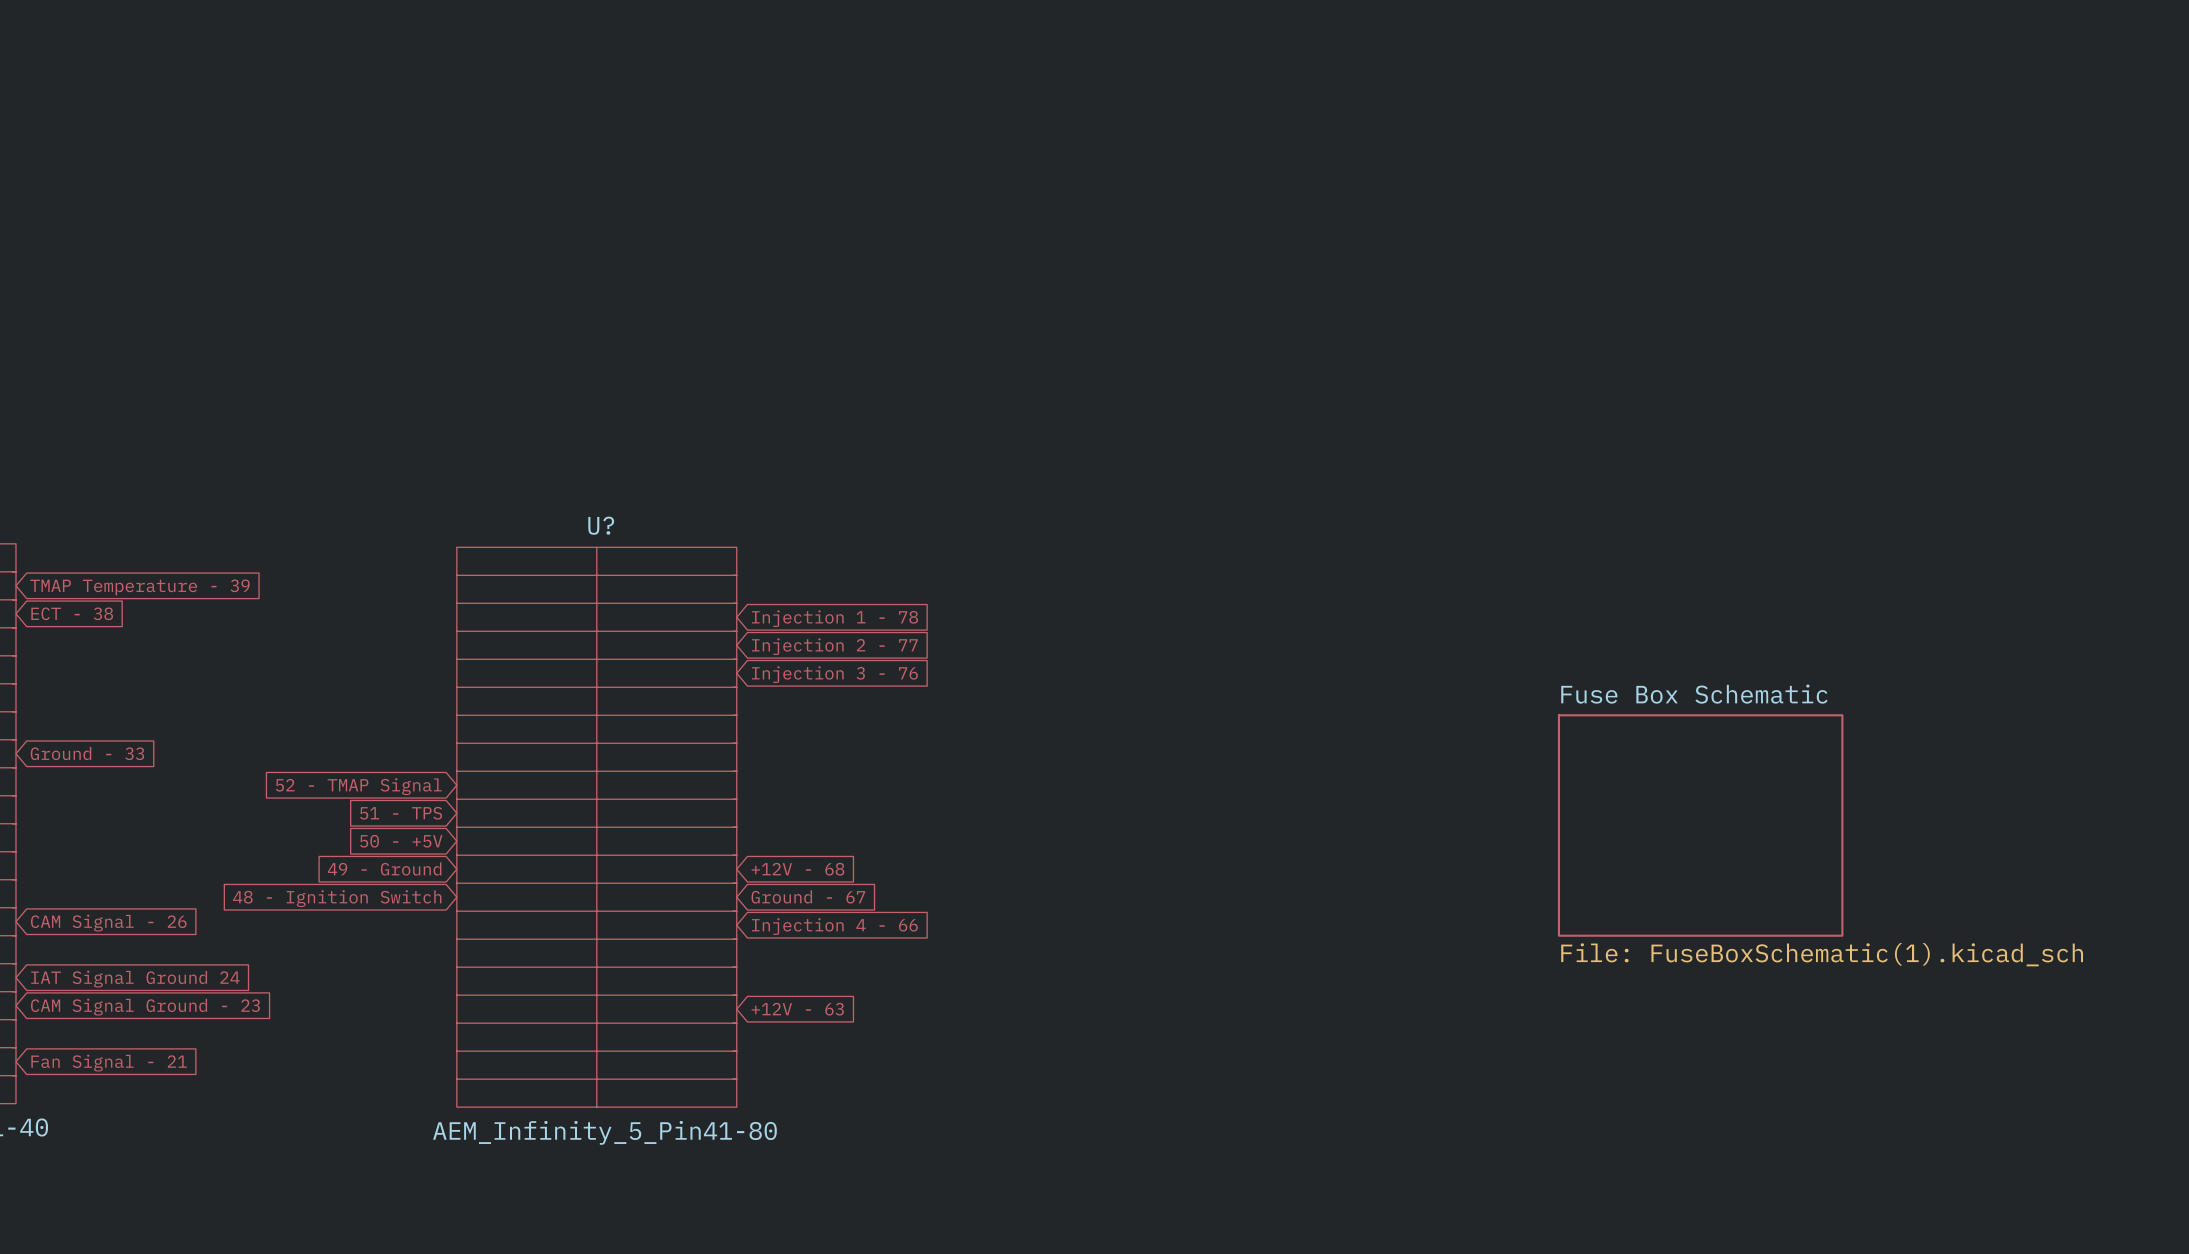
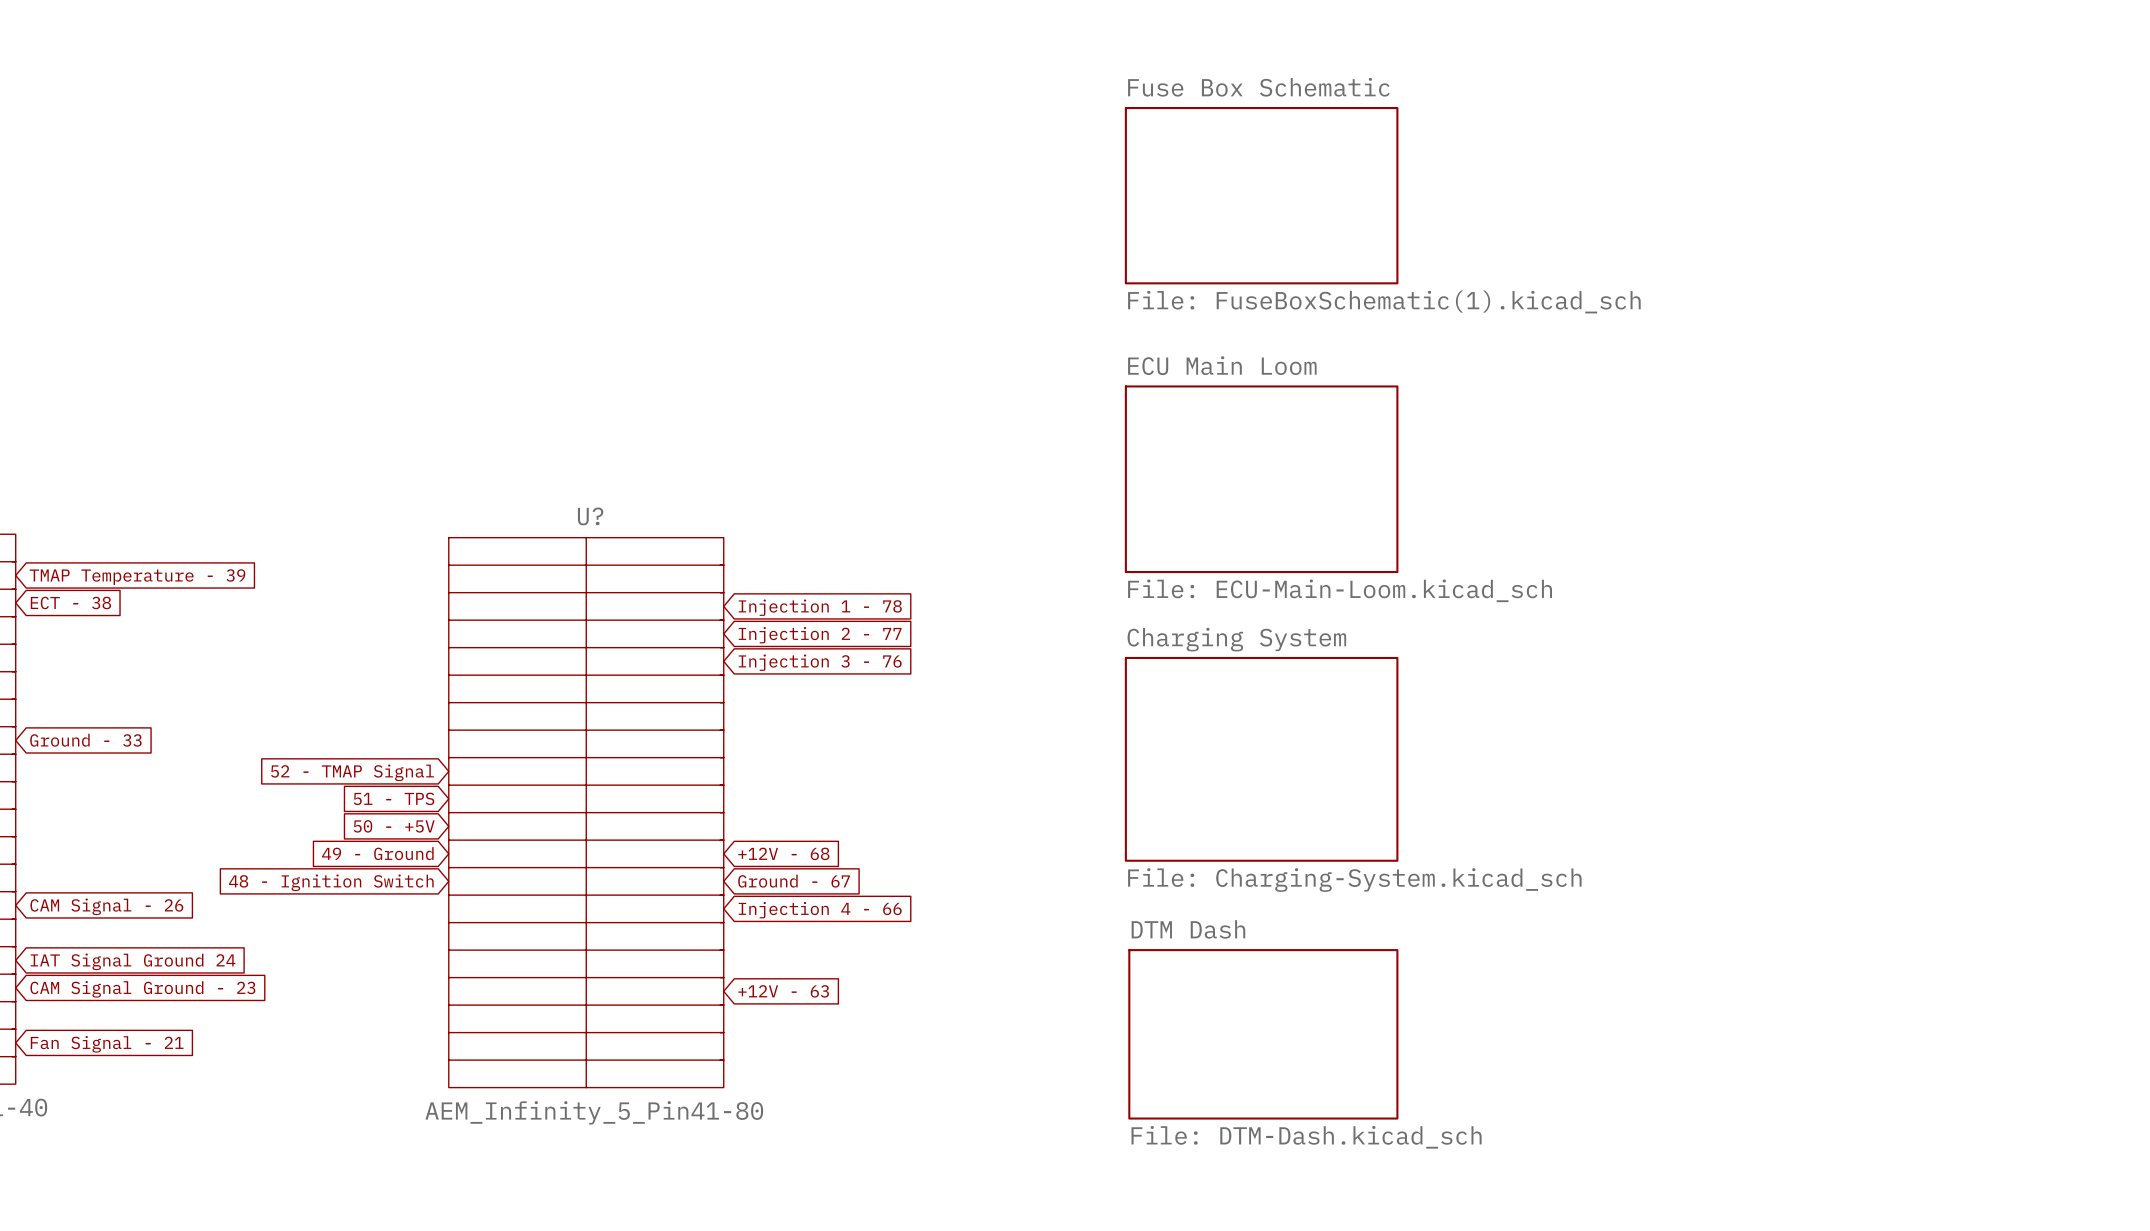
sheet Fuse Box Schematic: none -> File: FuseBoxSchematic(1).kicad_sch (1261, 195)
sheet ECU Main Loom: none -> File: ECU-Main-Loom.kicad_sch (1261, 479)
sheet Charging System: none -> File: Charging-System.kicad_sch (1261, 759)
sheet Fuse Box Schematic: File: FuseBoxSchematic(1).kicad_sch (1700, 825) -> none
sheet DTM Dash: none -> File: DTM-Dash.kicad_sch (1263, 1034)

